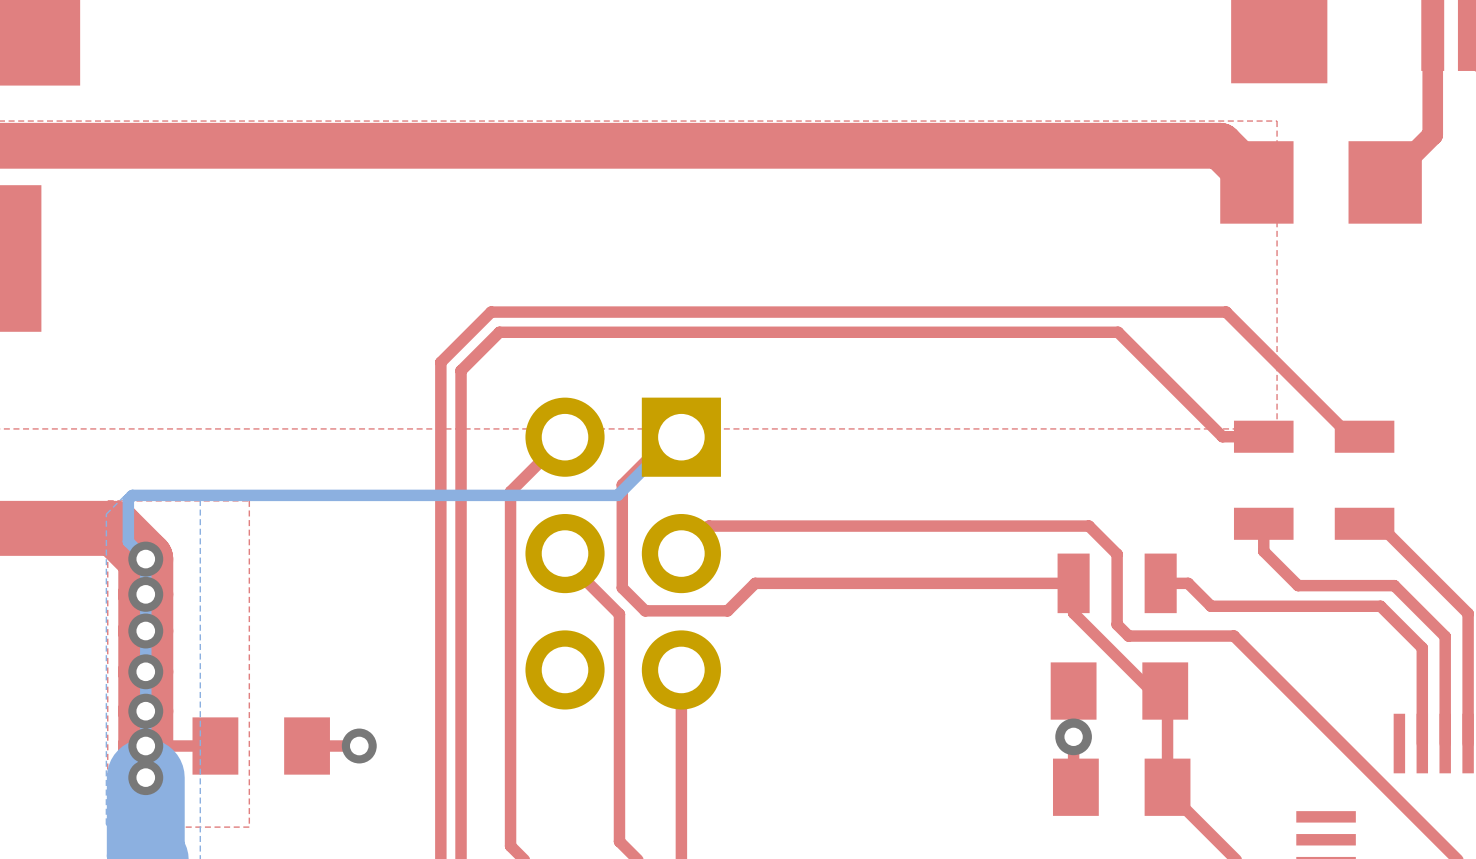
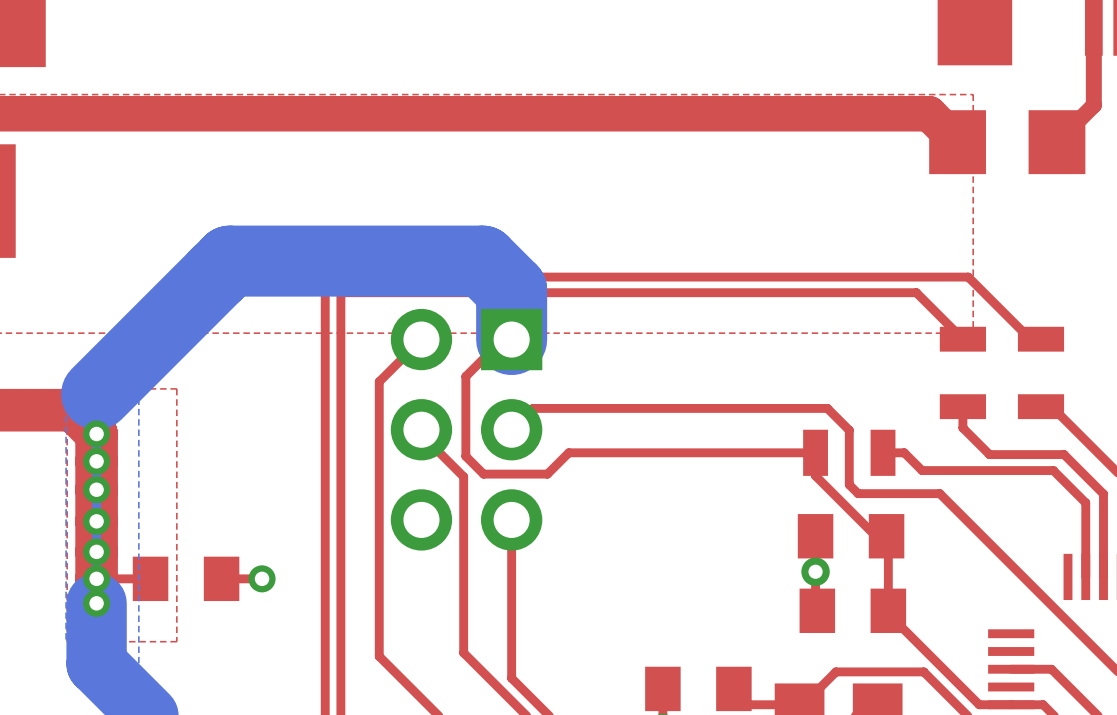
top track: (1270, 356) (1226, 312) (491, 312) (446, 356) -> (968, 277) (329, 277)
top track: (461, 376) (461, 370) (499, 332) (1118, 332) (1222, 436) (1263, 436) -> (340, 292) (916, 292) (962, 339)
bottom track: (681, 437) (675, 437) (617, 495) (132, 495) (128, 499) (128, 541) (145, 559) -> (511, 339) (511, 290) (482, 261) (229, 261) (96, 394) (96, 434)

